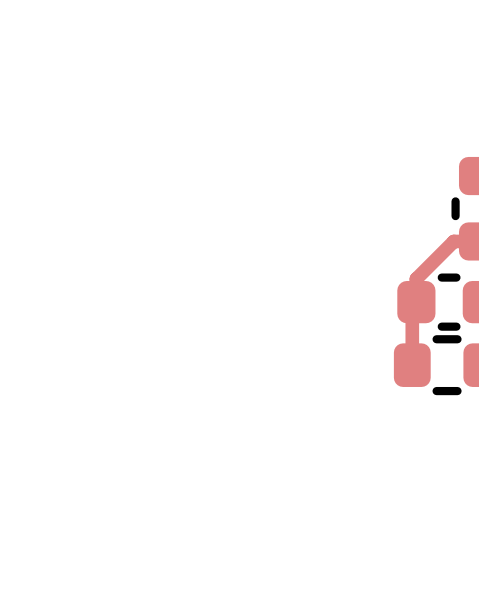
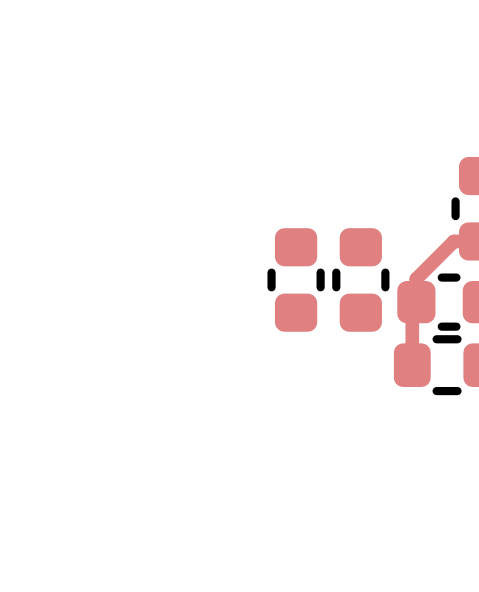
part: none -> (296, 279)
part: none -> (360, 279)

